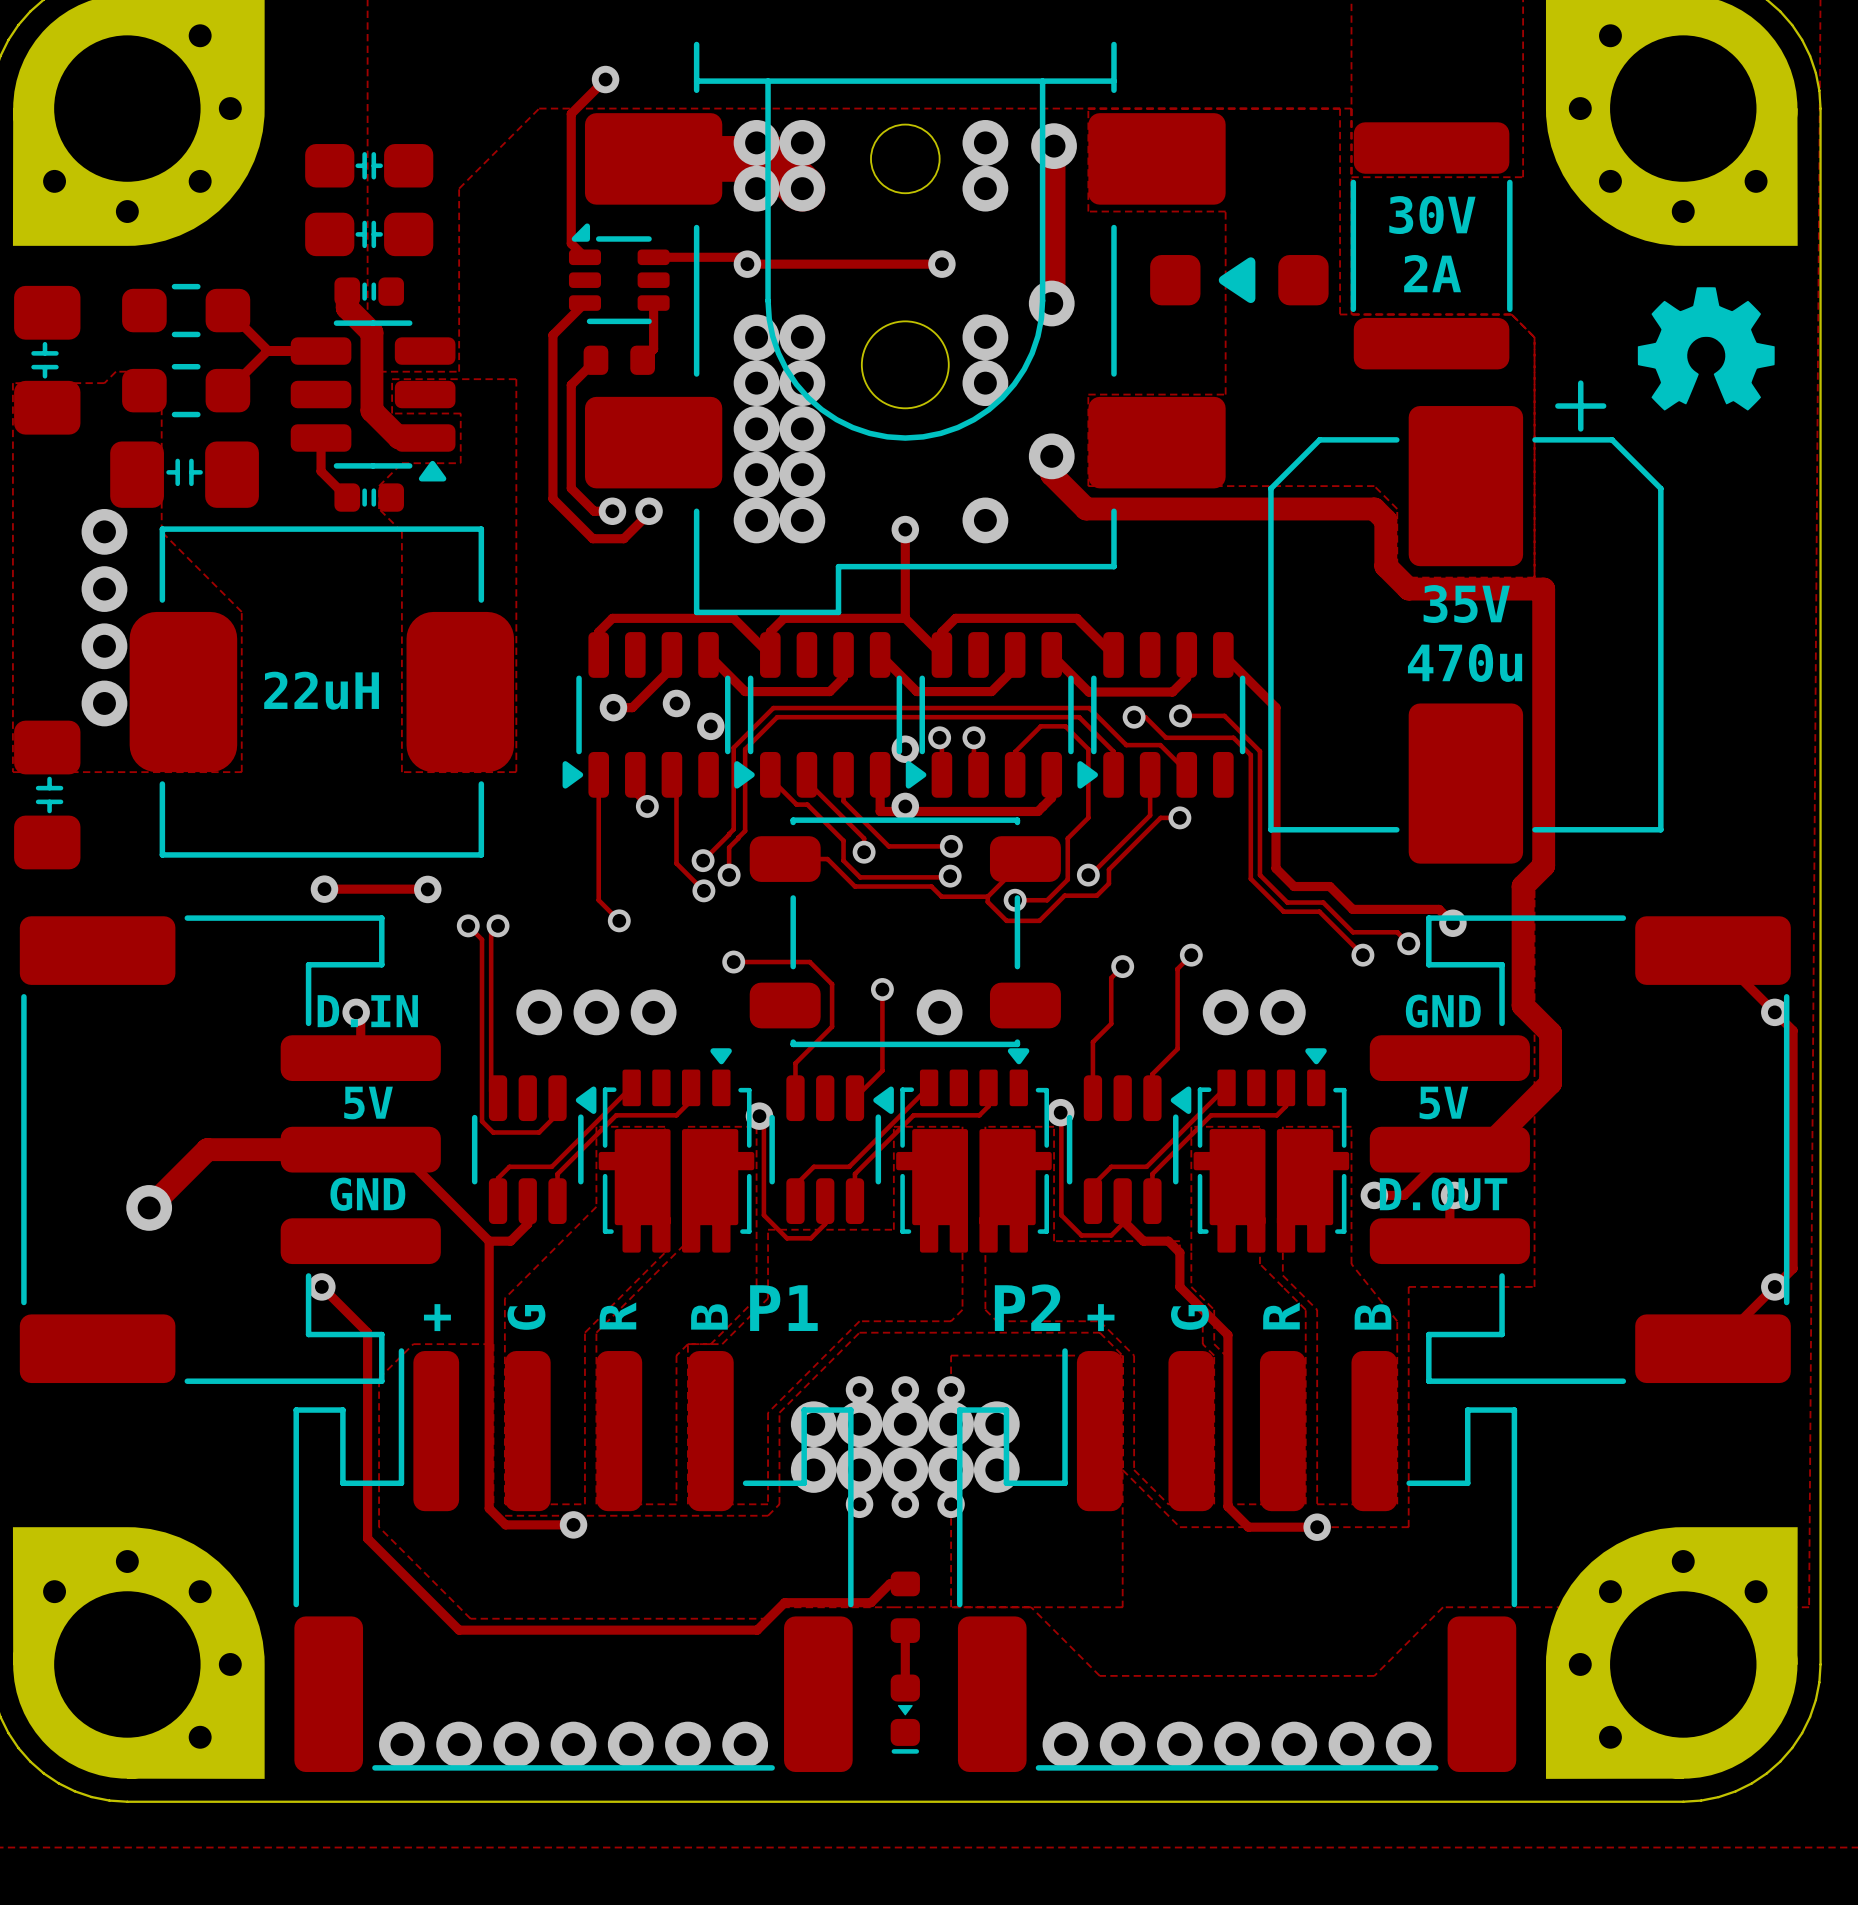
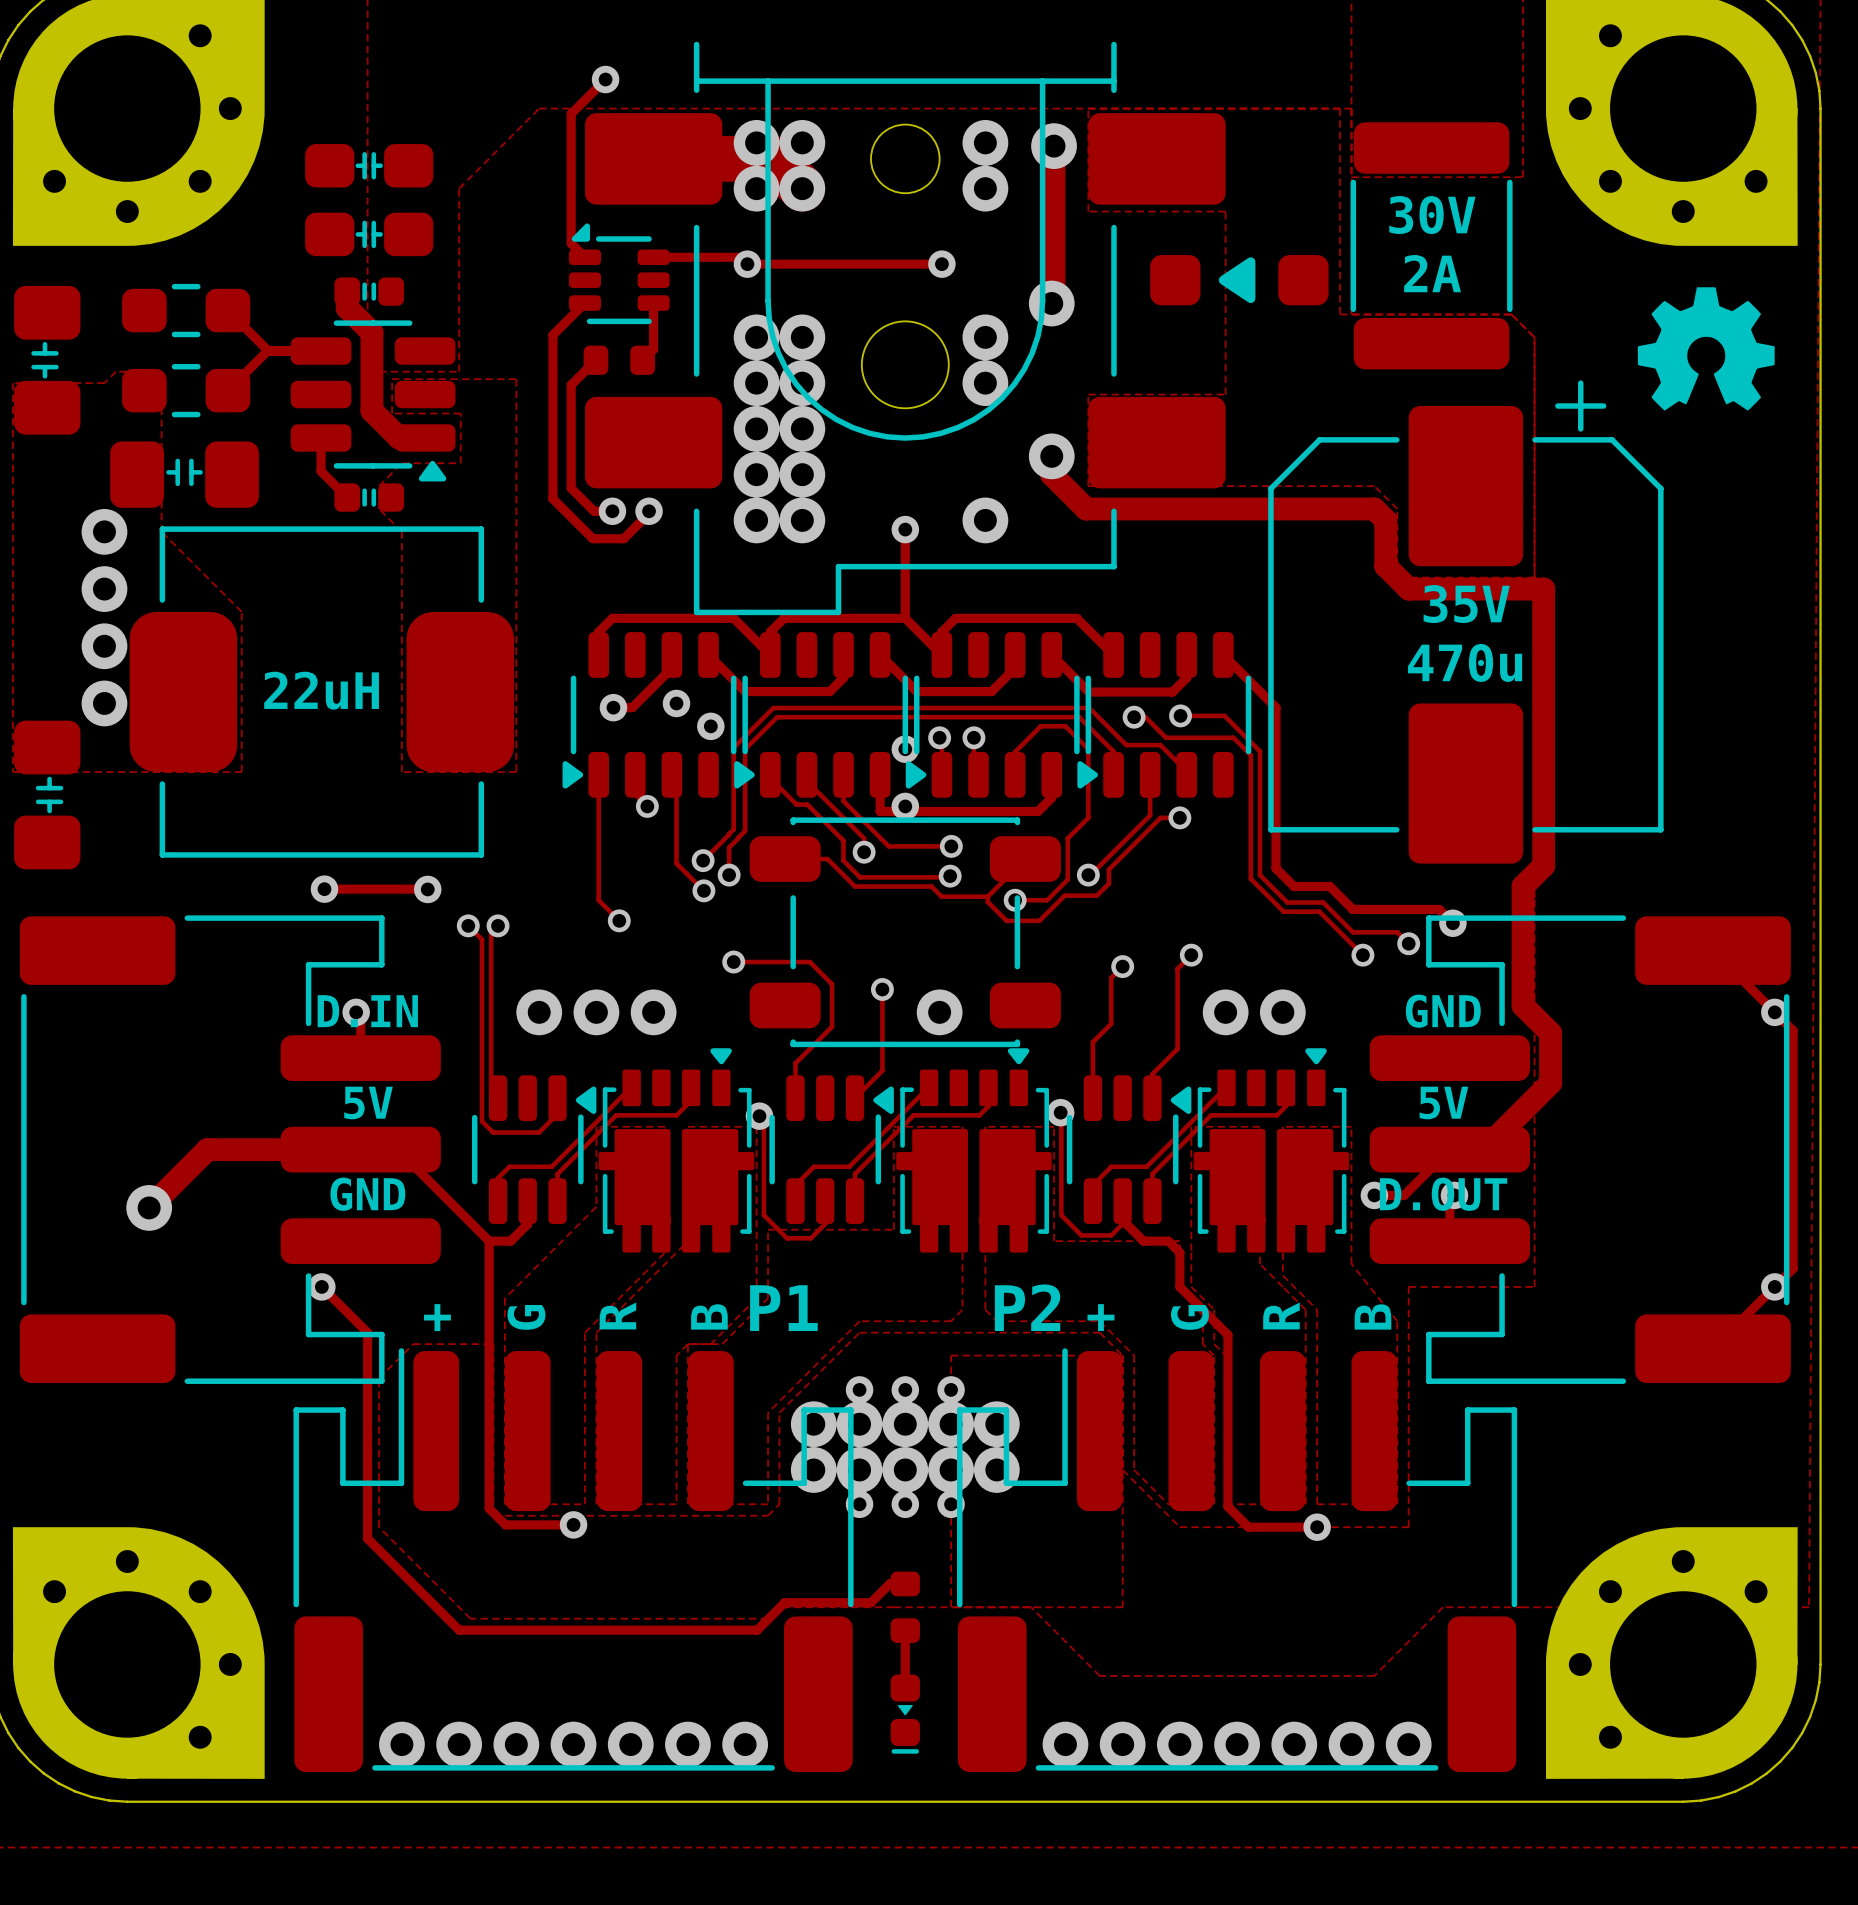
part footprint: [562, 632, 731, 798] -> [562, 632, 737, 798]
part footprint: [734, 632, 903, 798] -> [734, 632, 909, 798]
part footprint: [905, 632, 1074, 798] -> [905, 632, 1080, 798]
part footprint: [1077, 632, 1246, 798] -> [1077, 632, 1252, 798]

